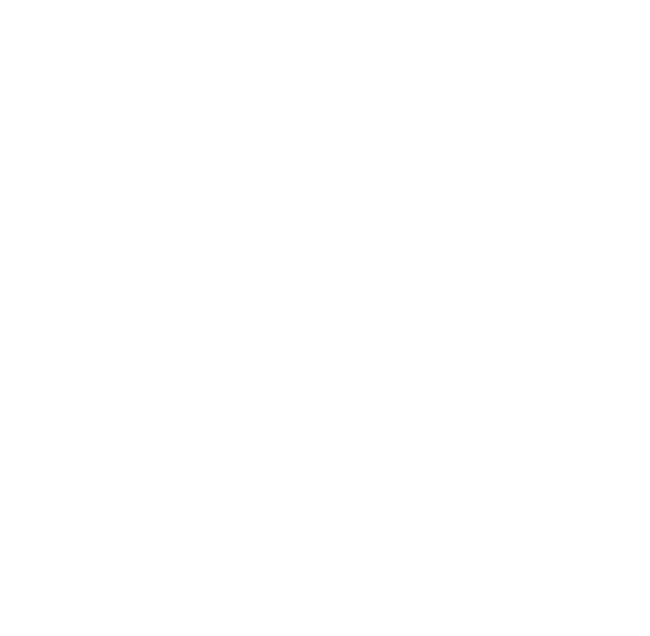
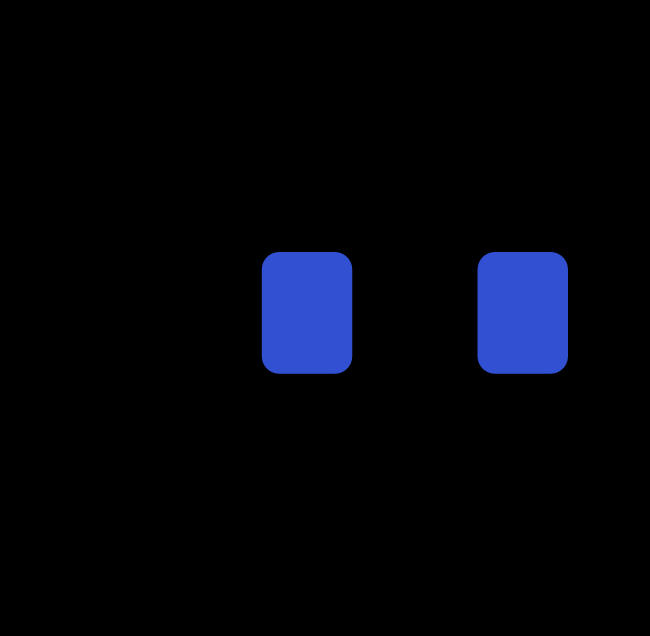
part: none -> (414, 312)

